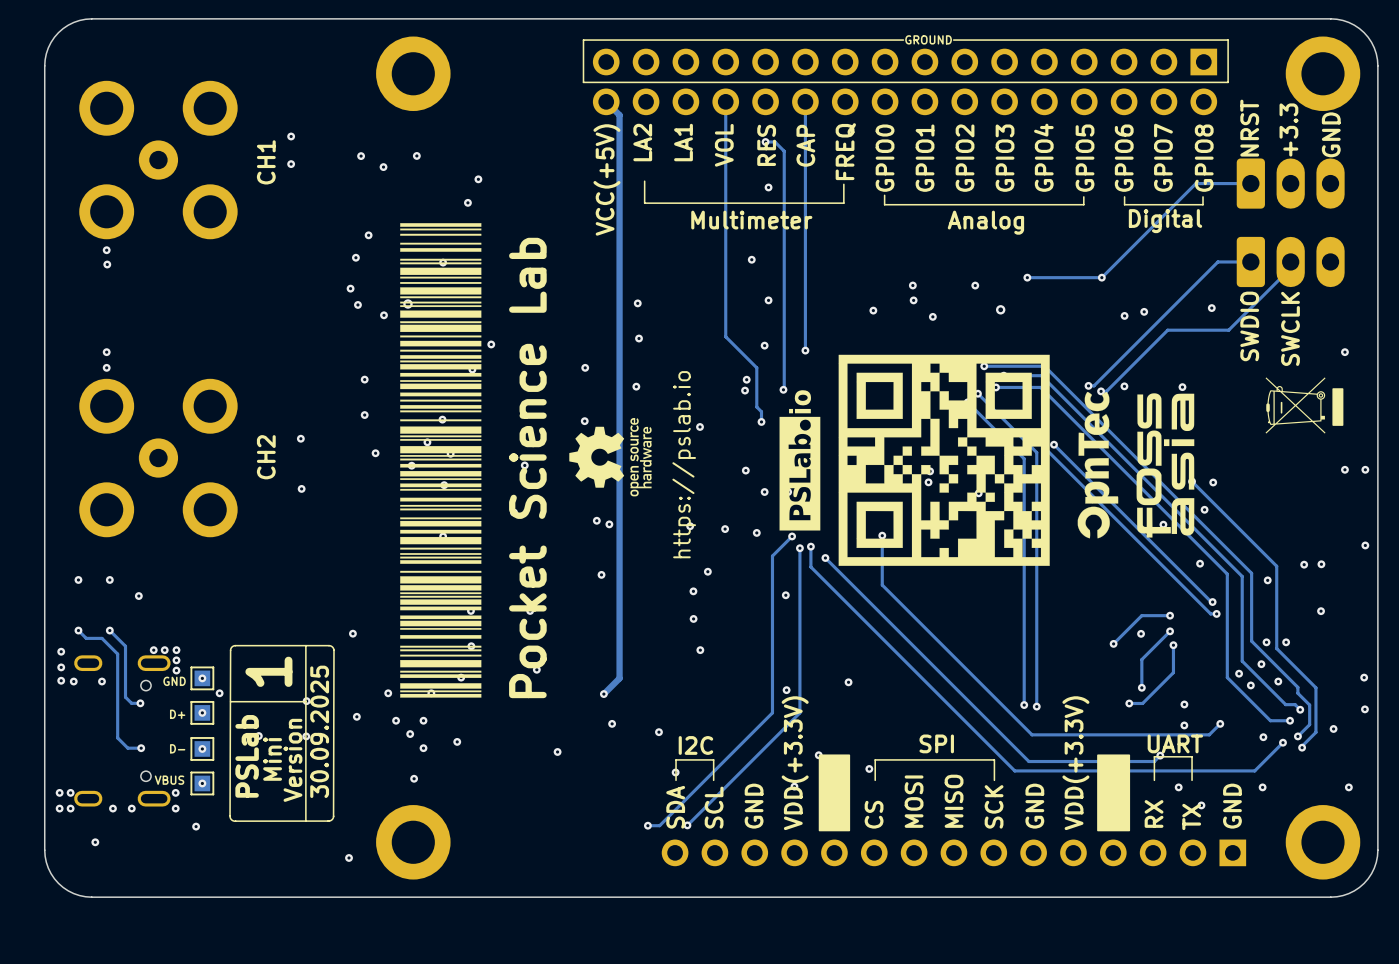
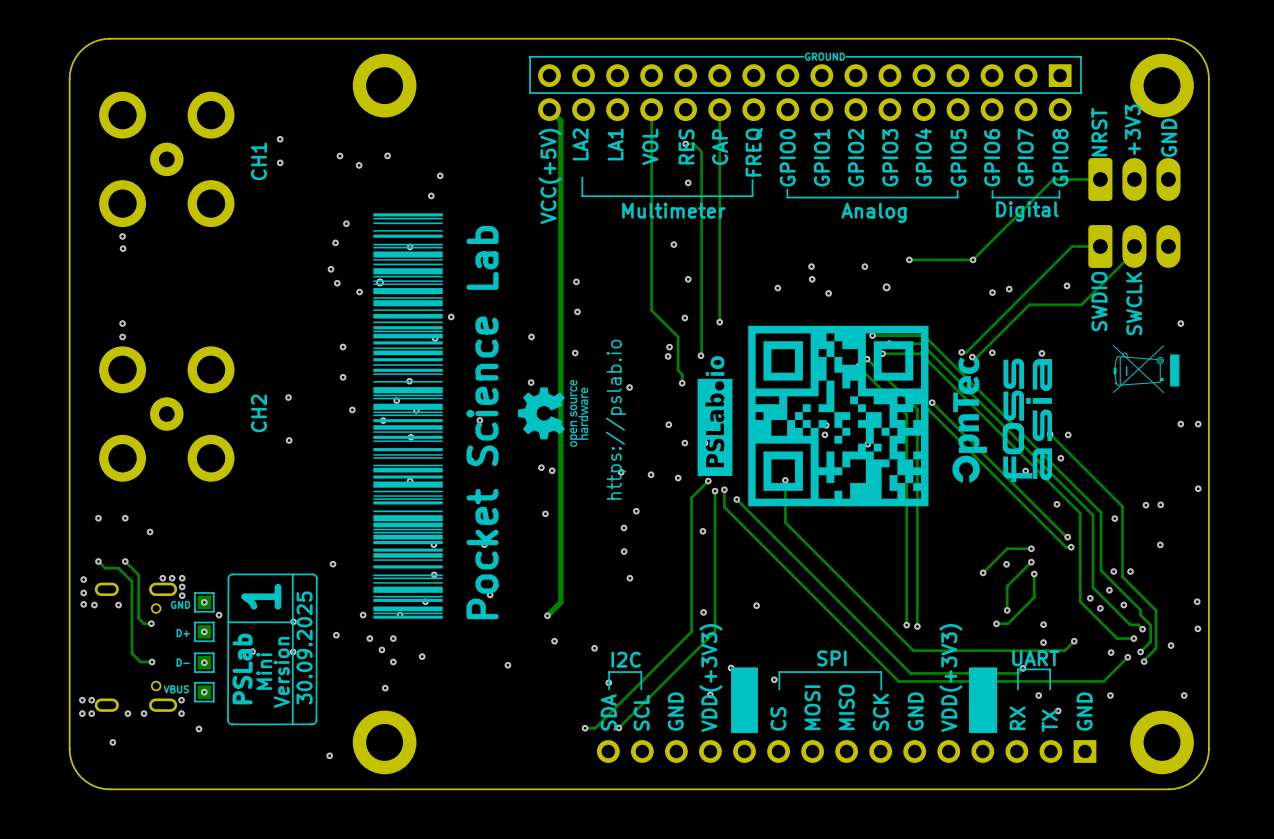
text: +3.3 (1288, 129) -> +3V3 (1132, 129)
text: VDD(+3.3V) (795, 763) -> VDD(+3V3) (710, 678)
text: VDD(+3.3V) (1075, 763) -> VDD(+3V3) (950, 678)

